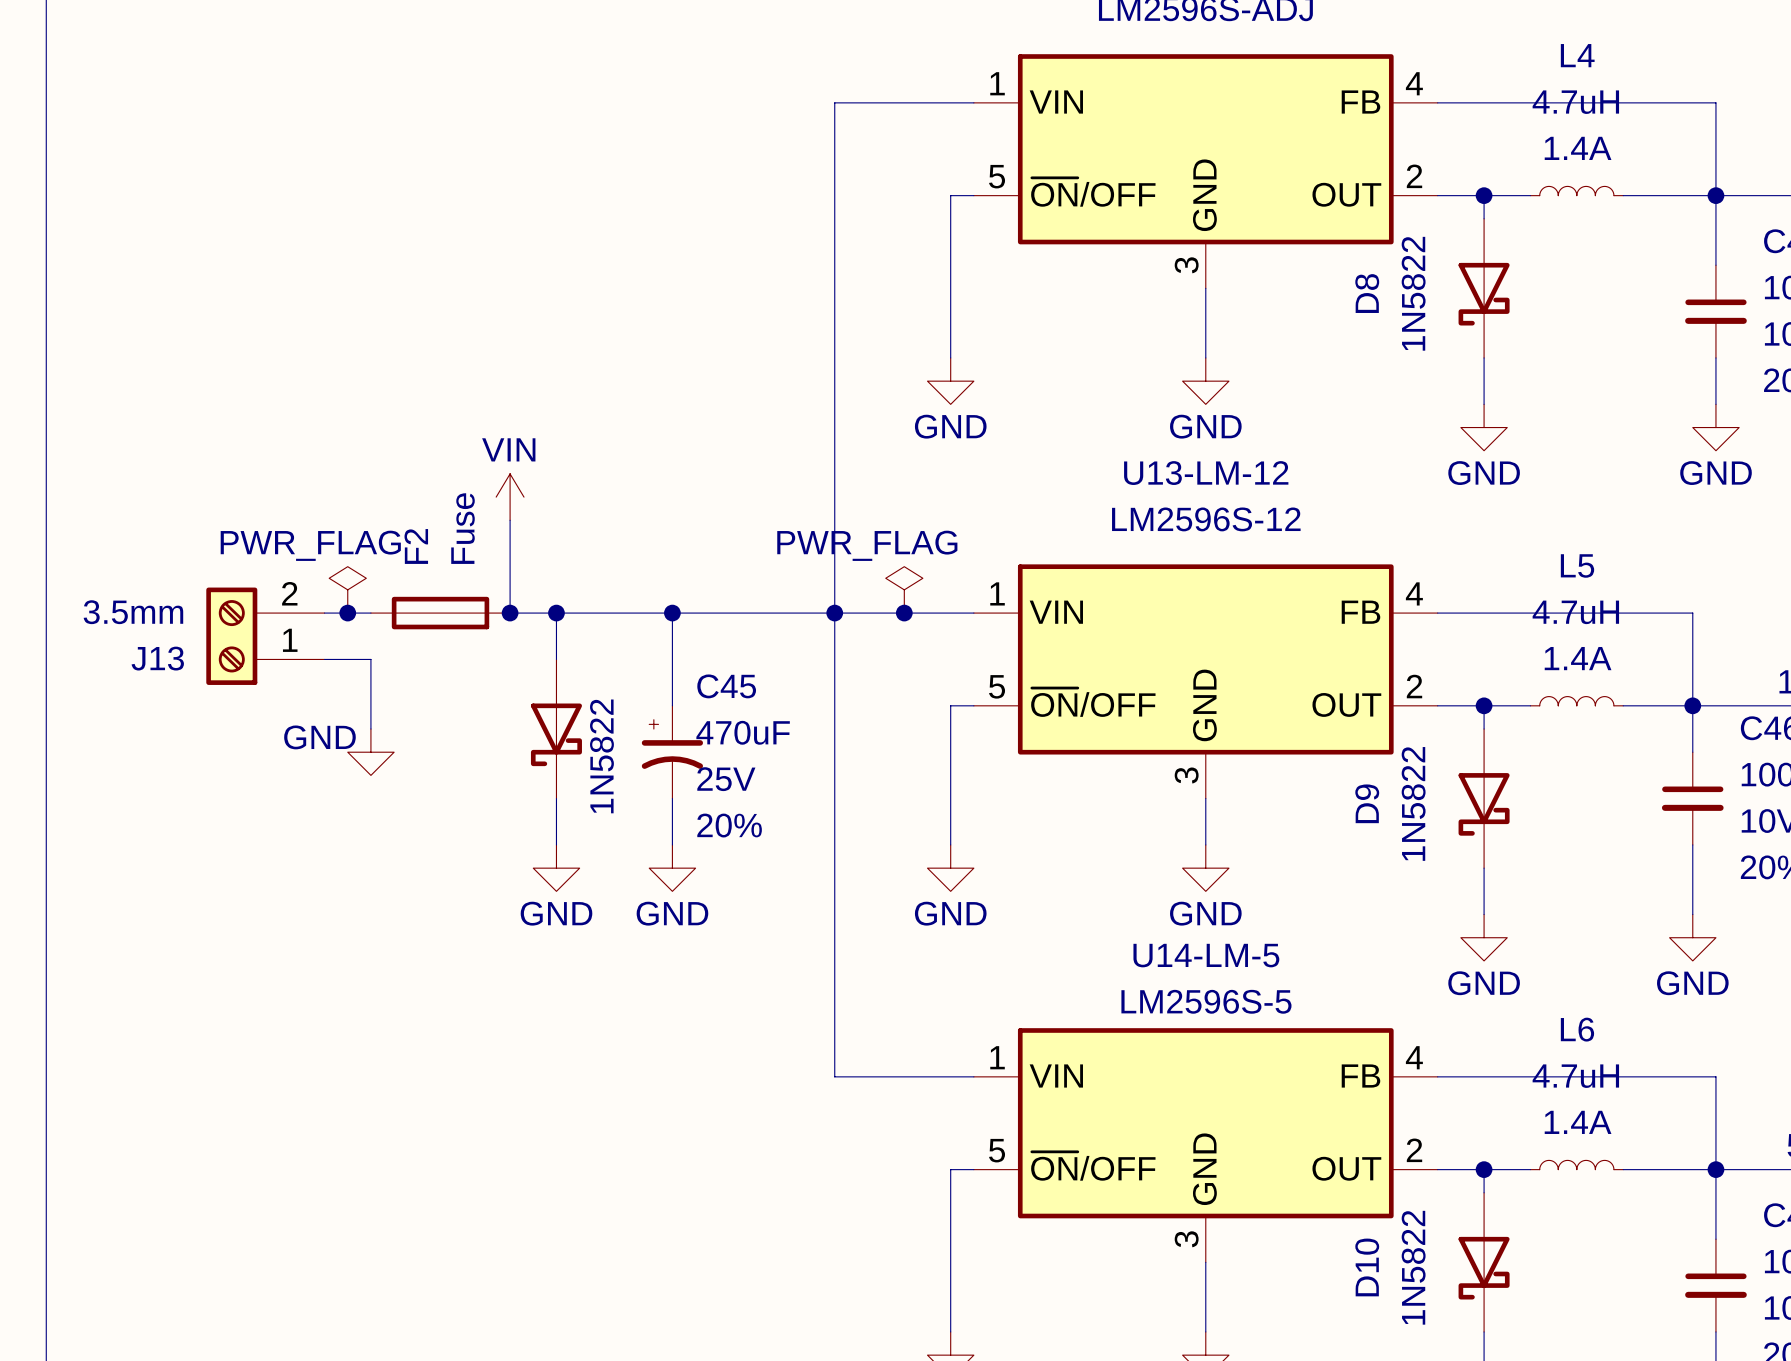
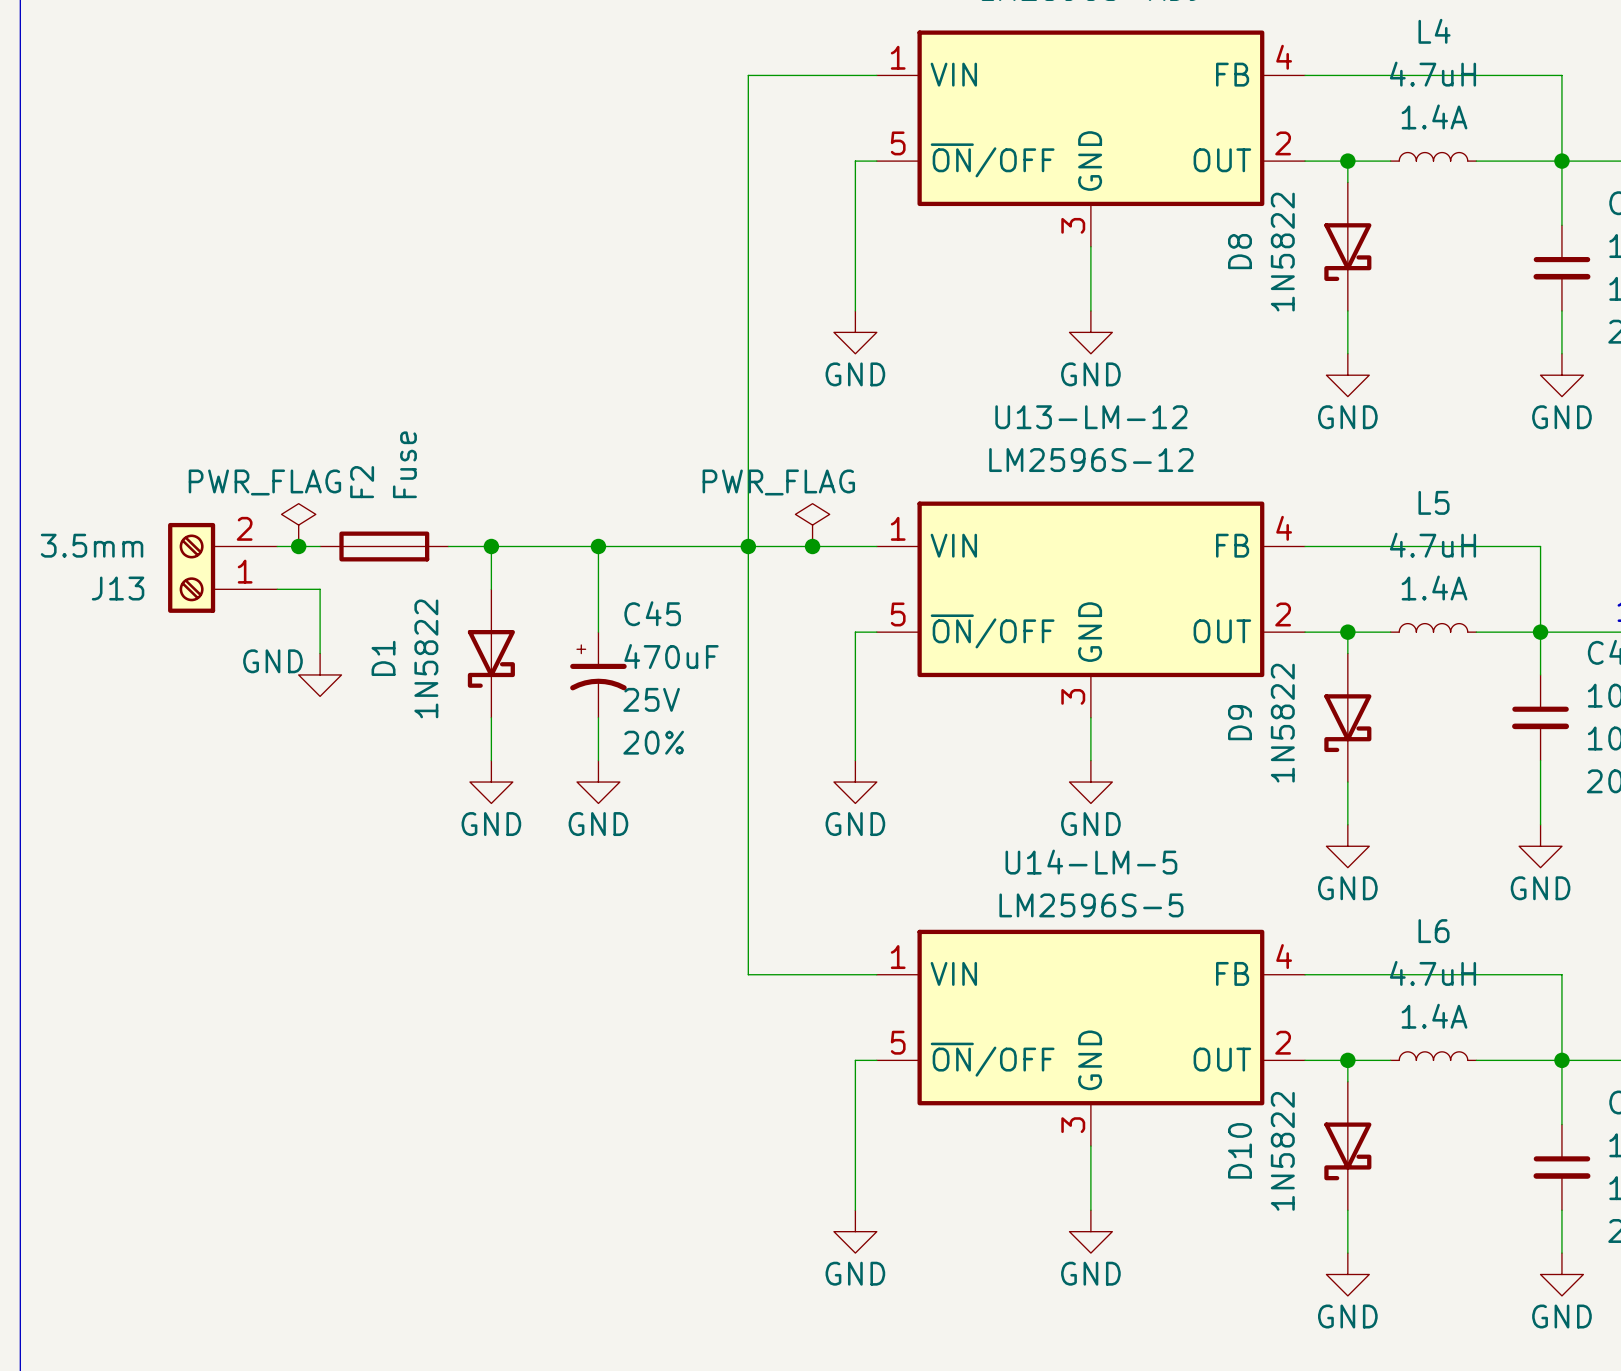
power symbol: VIN (510, 497) -> none
wire: (510, 520) (510, 613) -> none
junction: (510, 613) -> none
D1 name: none -> D1 (383, 658)
D1 value position: 1N5822 (601, 756) -> 1N5822 (426, 658)

